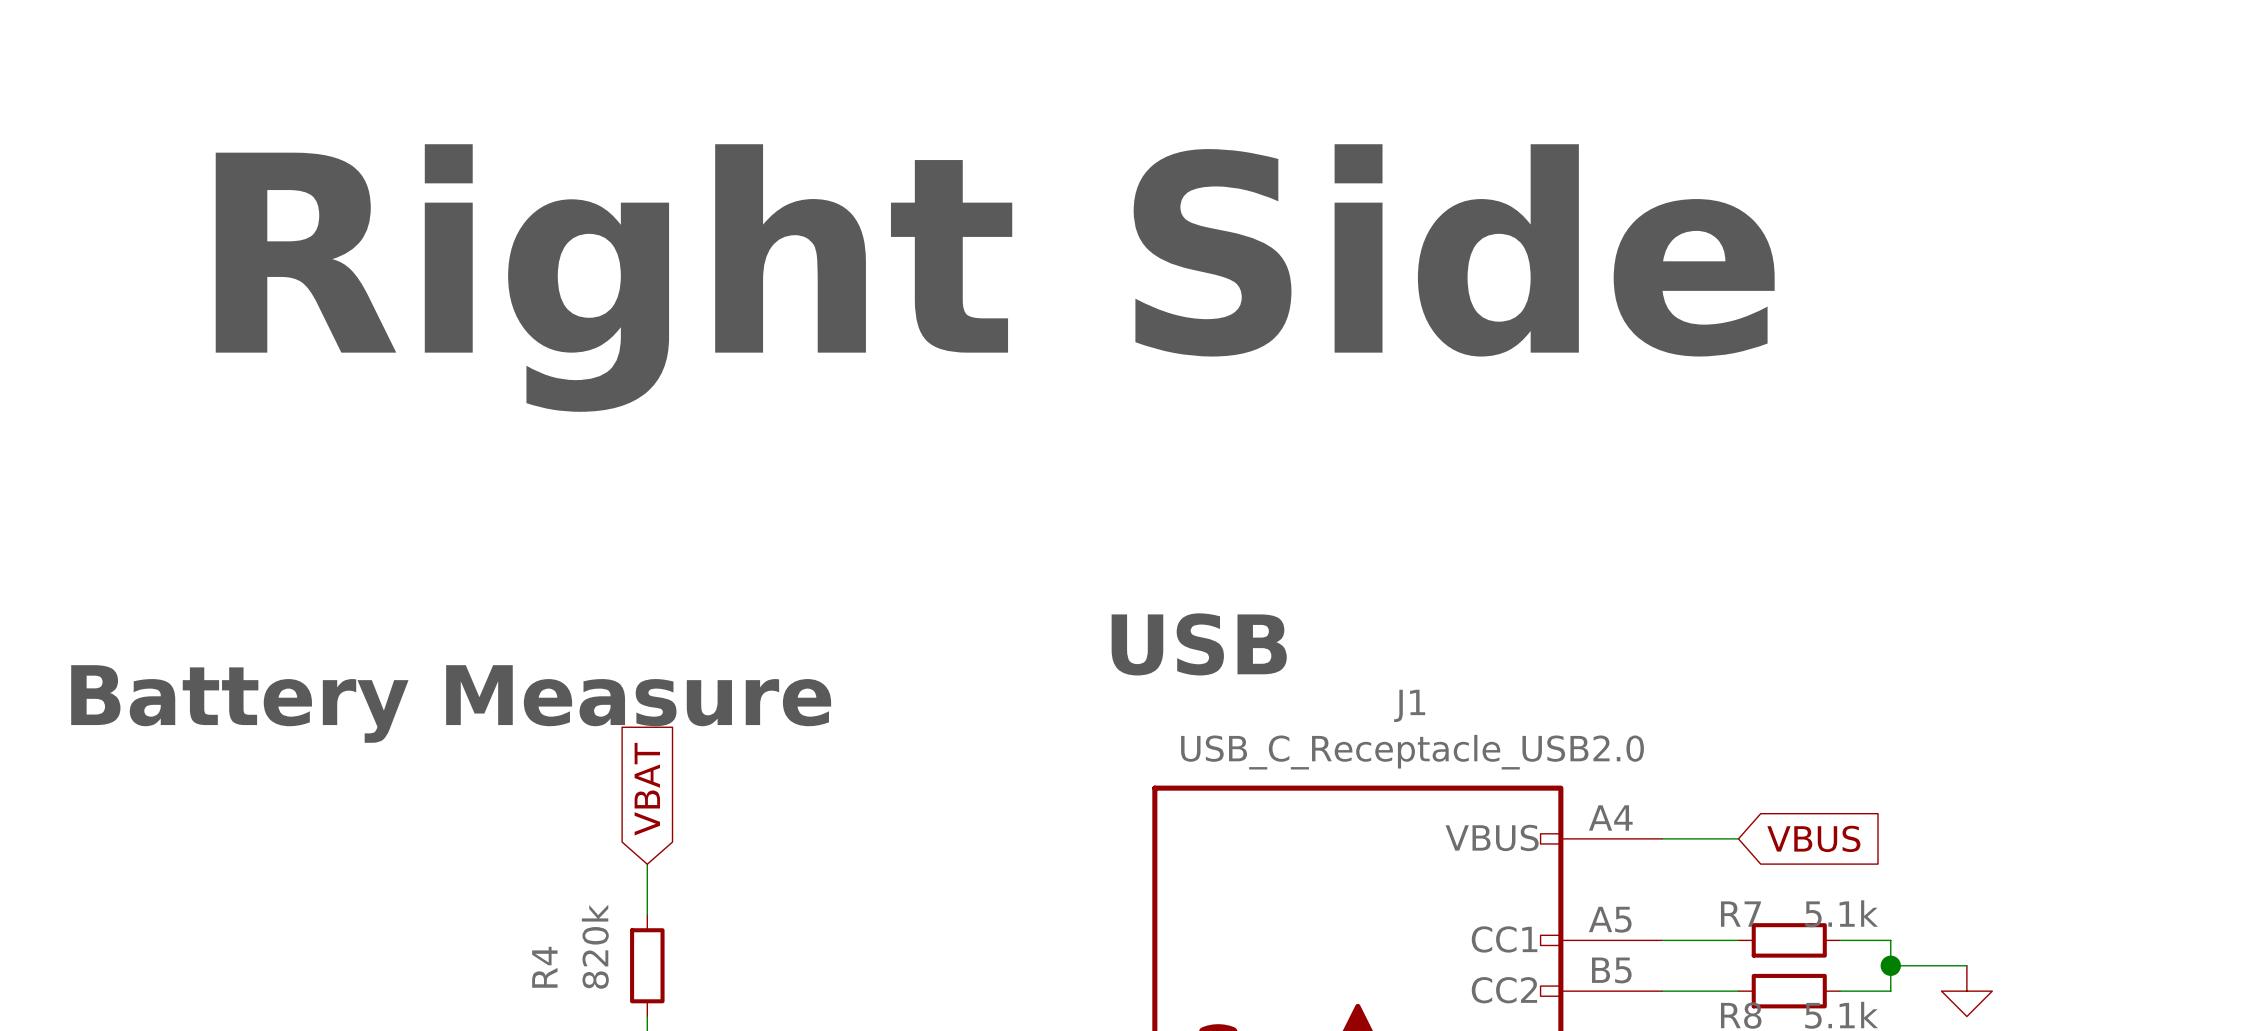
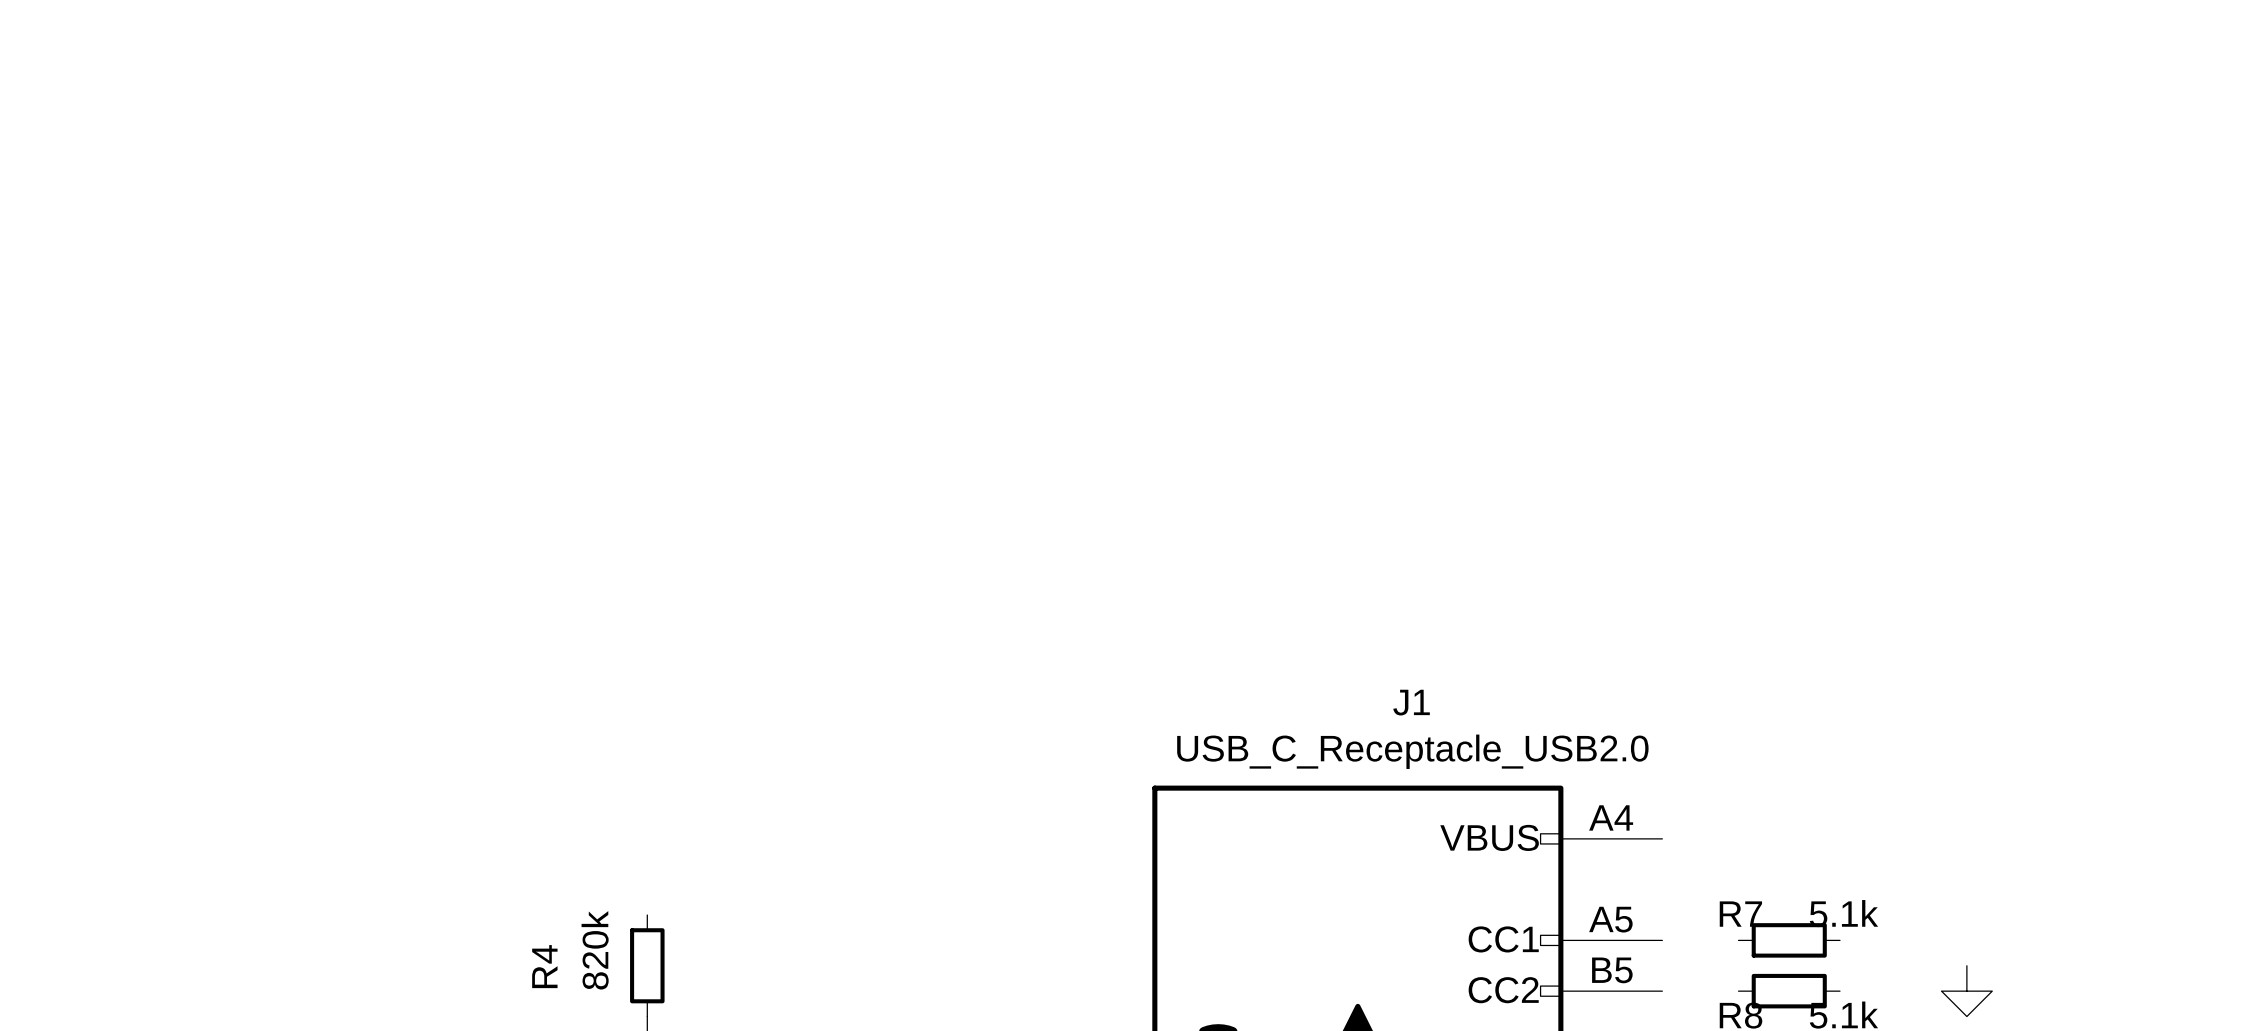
text: Right Side (995, 278) -> none
text: USB (1199, 644) -> none
text: Battery Measure (451, 703) -> none
global label: VBAT (647, 789) -> none
wire: (1662, 838) (1738, 838) -> none
global label: VBUS (1813, 838) -> none
wire: (647, 864) (647, 915) -> none
wire: (1662, 940) (1738, 940) -> none
wire: (1840, 940) (1890, 940) (1890, 991) (1840, 991) -> none
wire: (1890, 965) (1966, 965) -> none
junction: (1890, 965) -> none
wire: (1662, 991) (1738, 991) -> none

